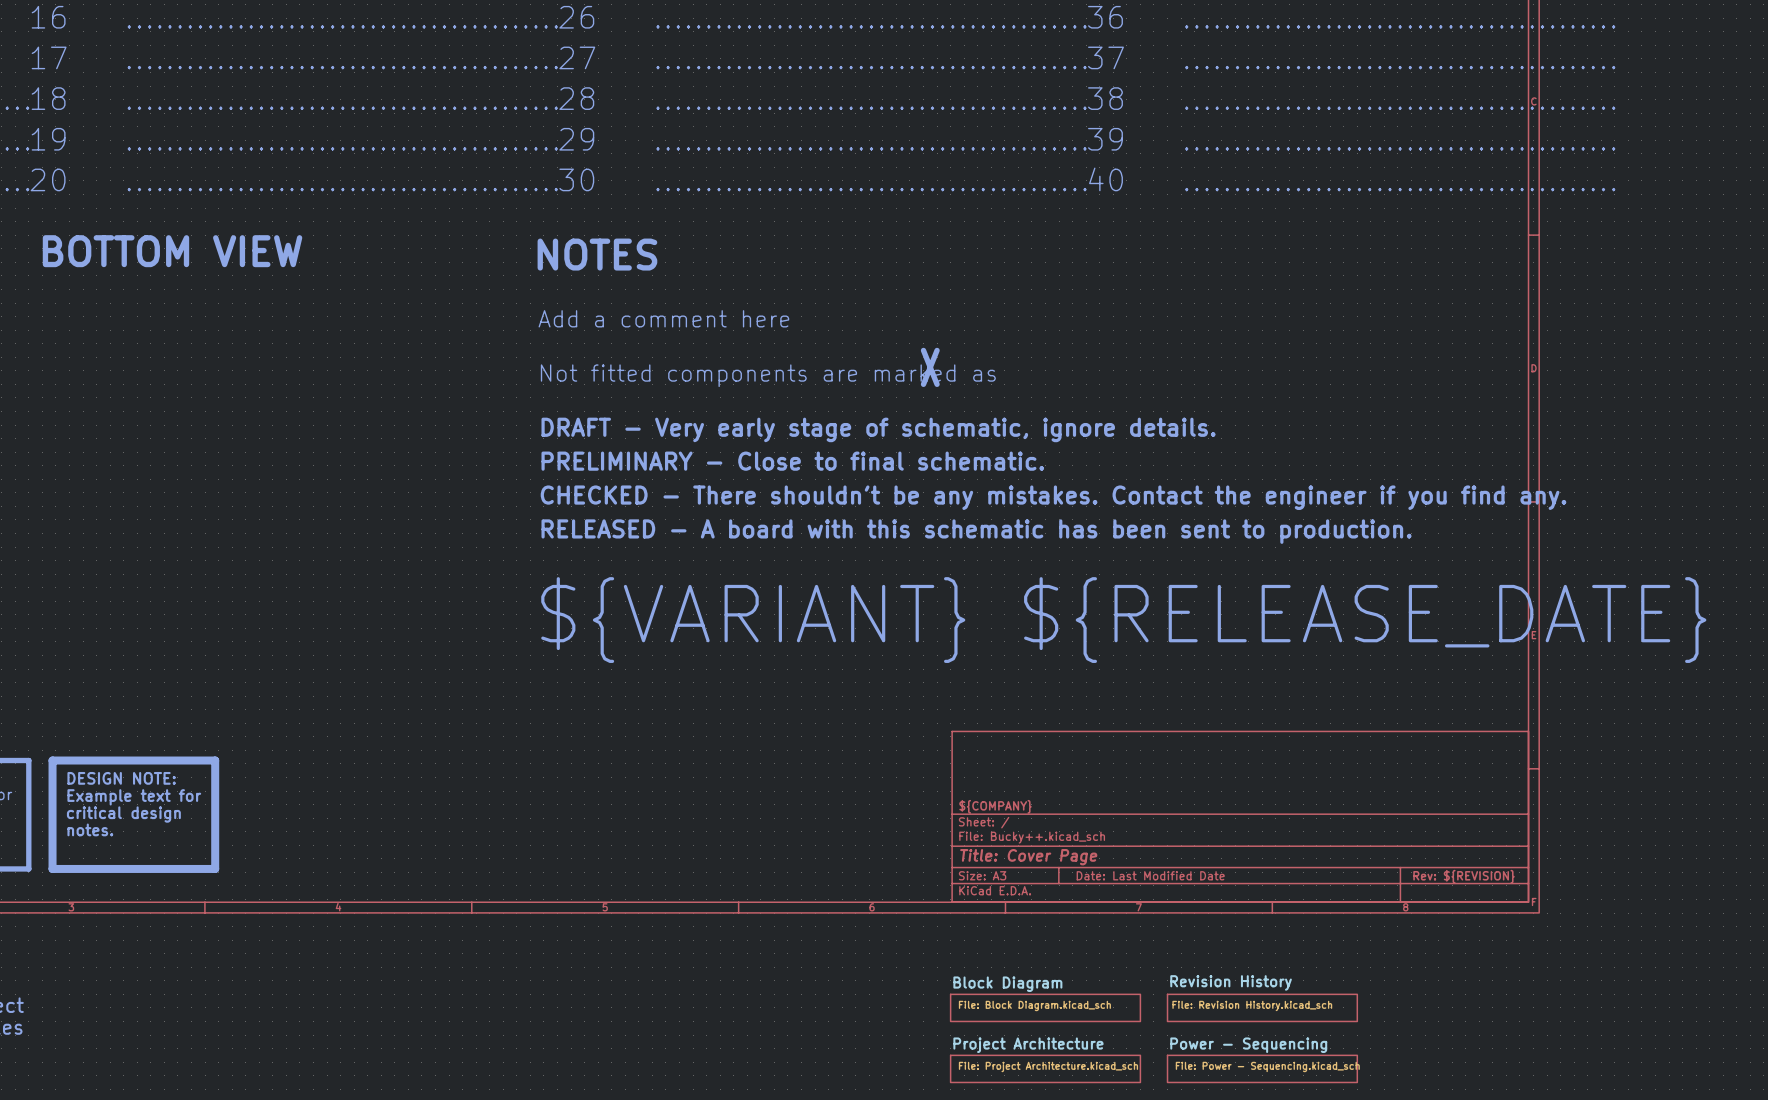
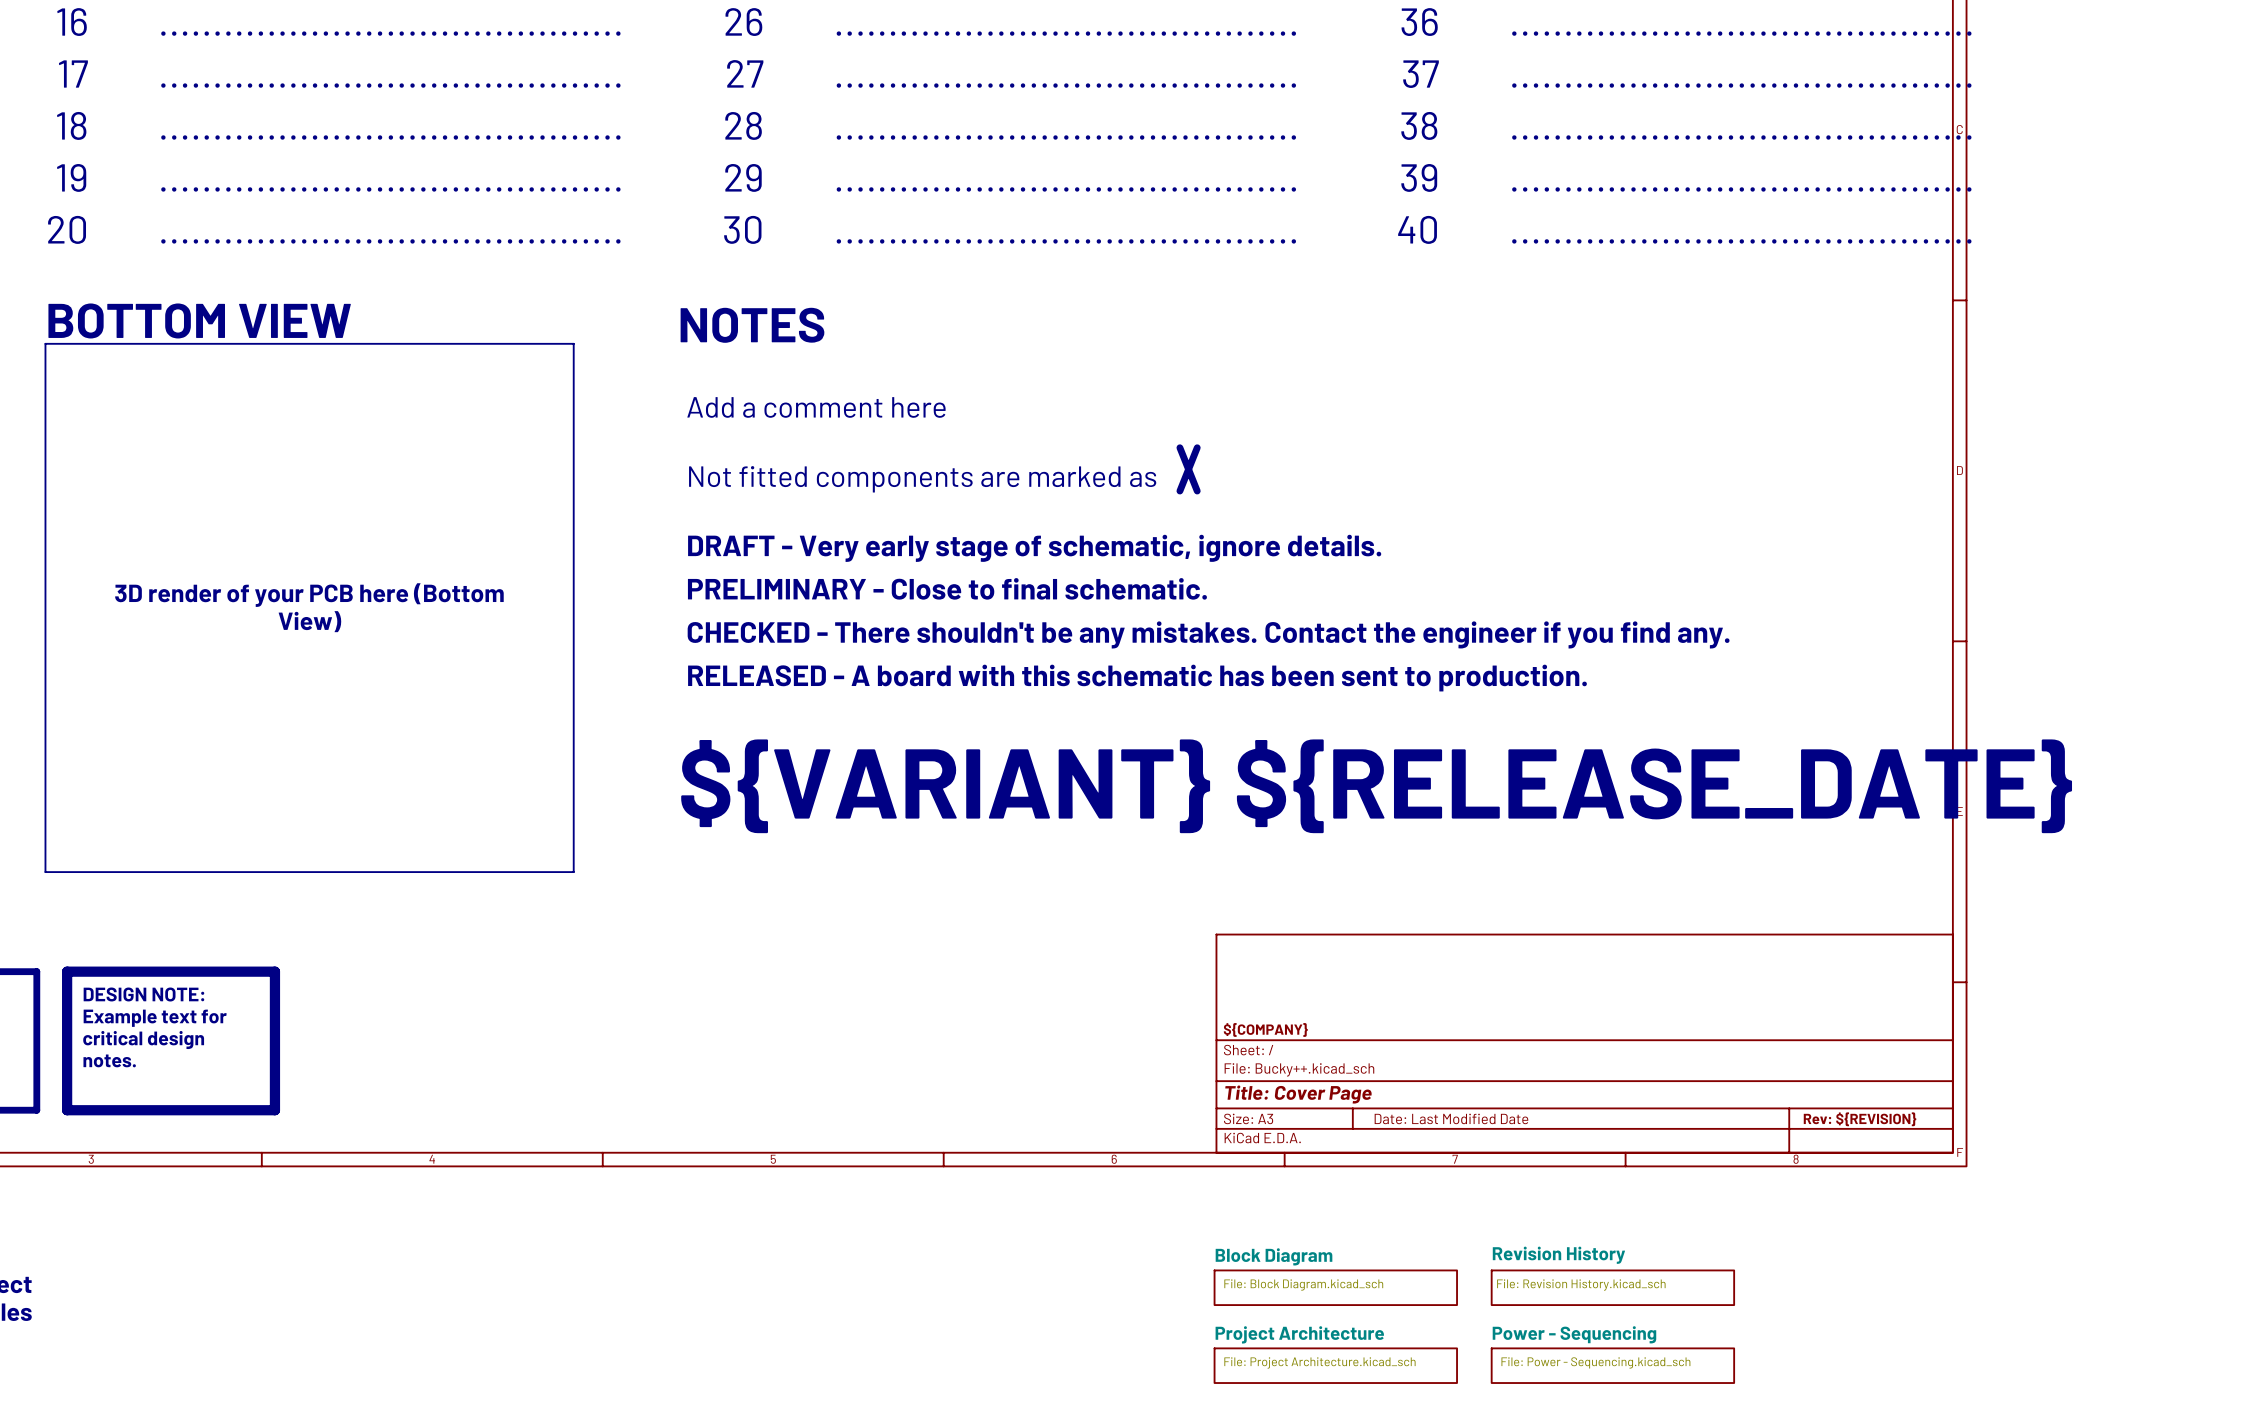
line: none -> (45, 343) (573, 343) (573, 872) (45, 872) (45, 343)
text: none -> 3D render of your PCB here (Bottom (309, 595)
text: none -> View) (309, 621)

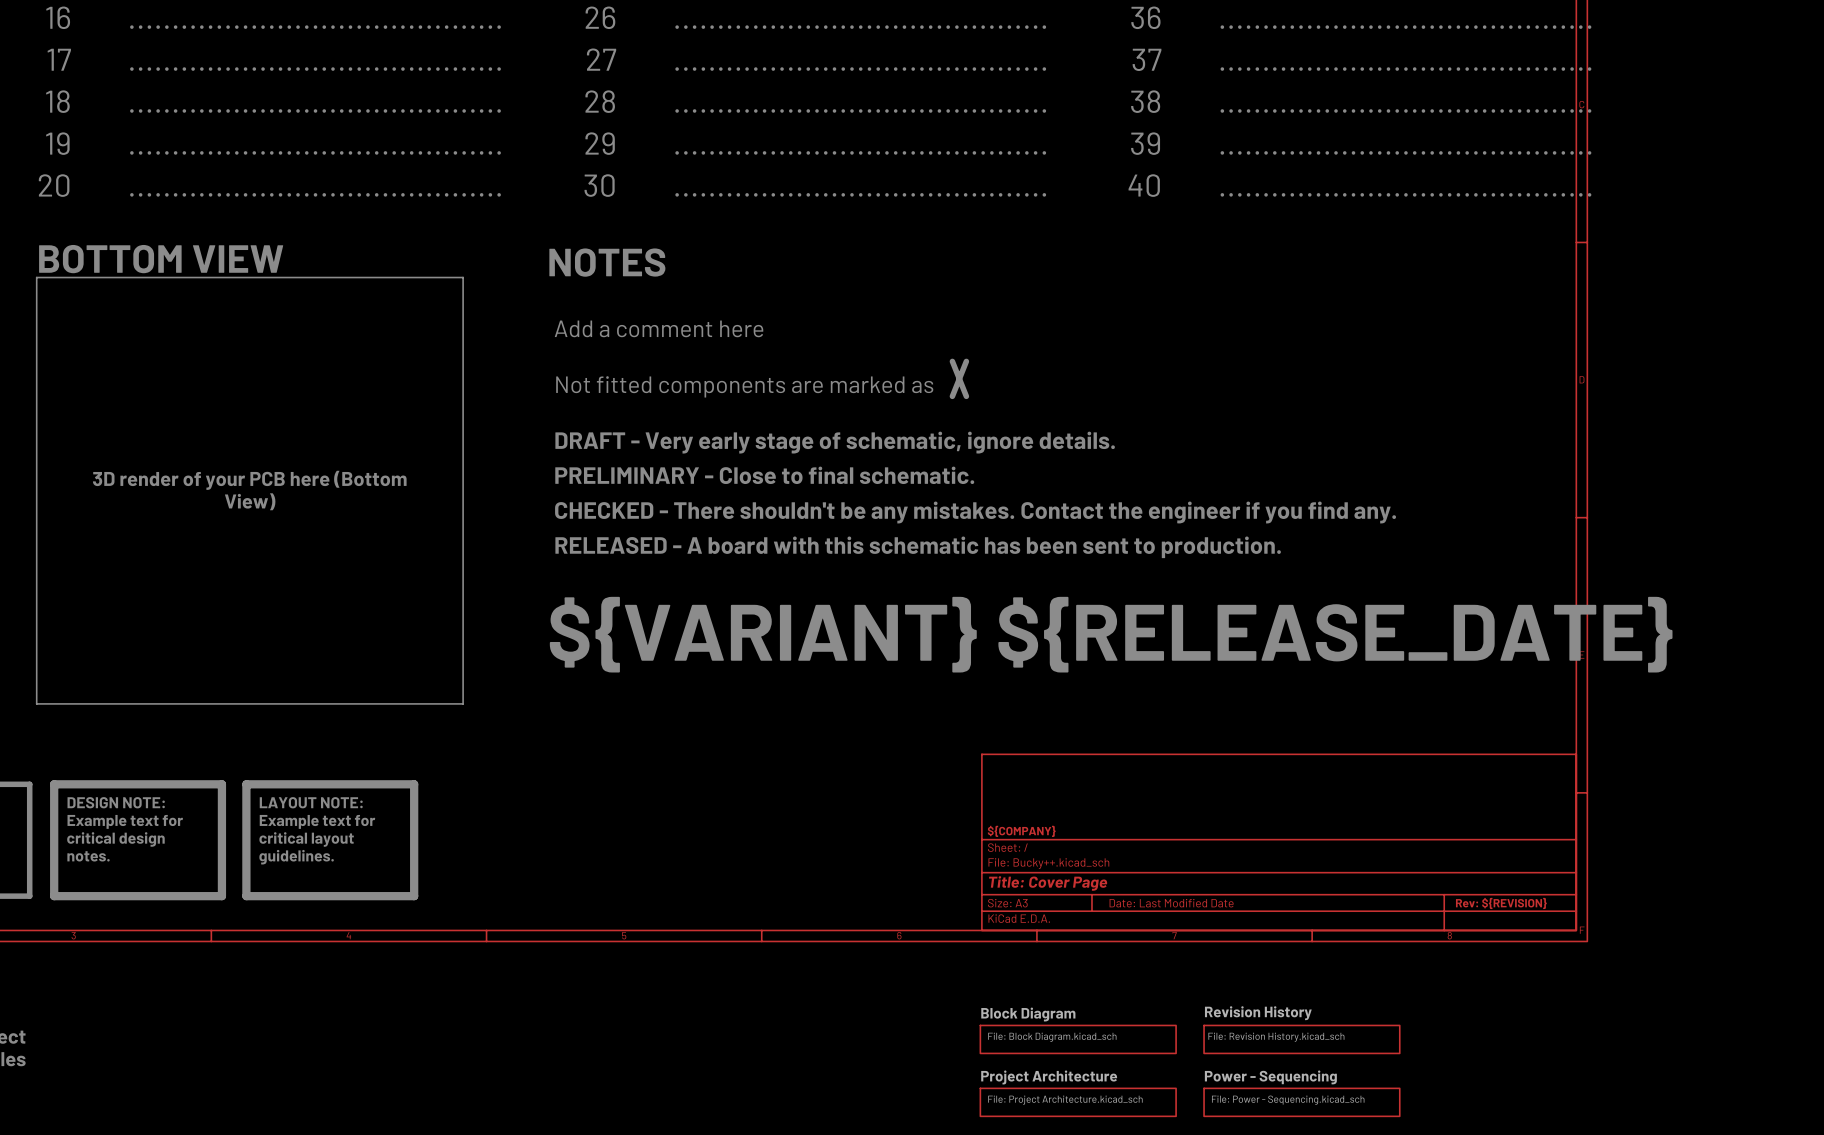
line: none -> (246, 784) (414, 784) (414, 896) (246, 896) (246, 784)
text: none -> LAYOUT NOTE: (311, 802)
text: none -> Example text for (317, 821)
text: none -> critical layout (306, 839)
text: none -> guidelines. (296, 857)

